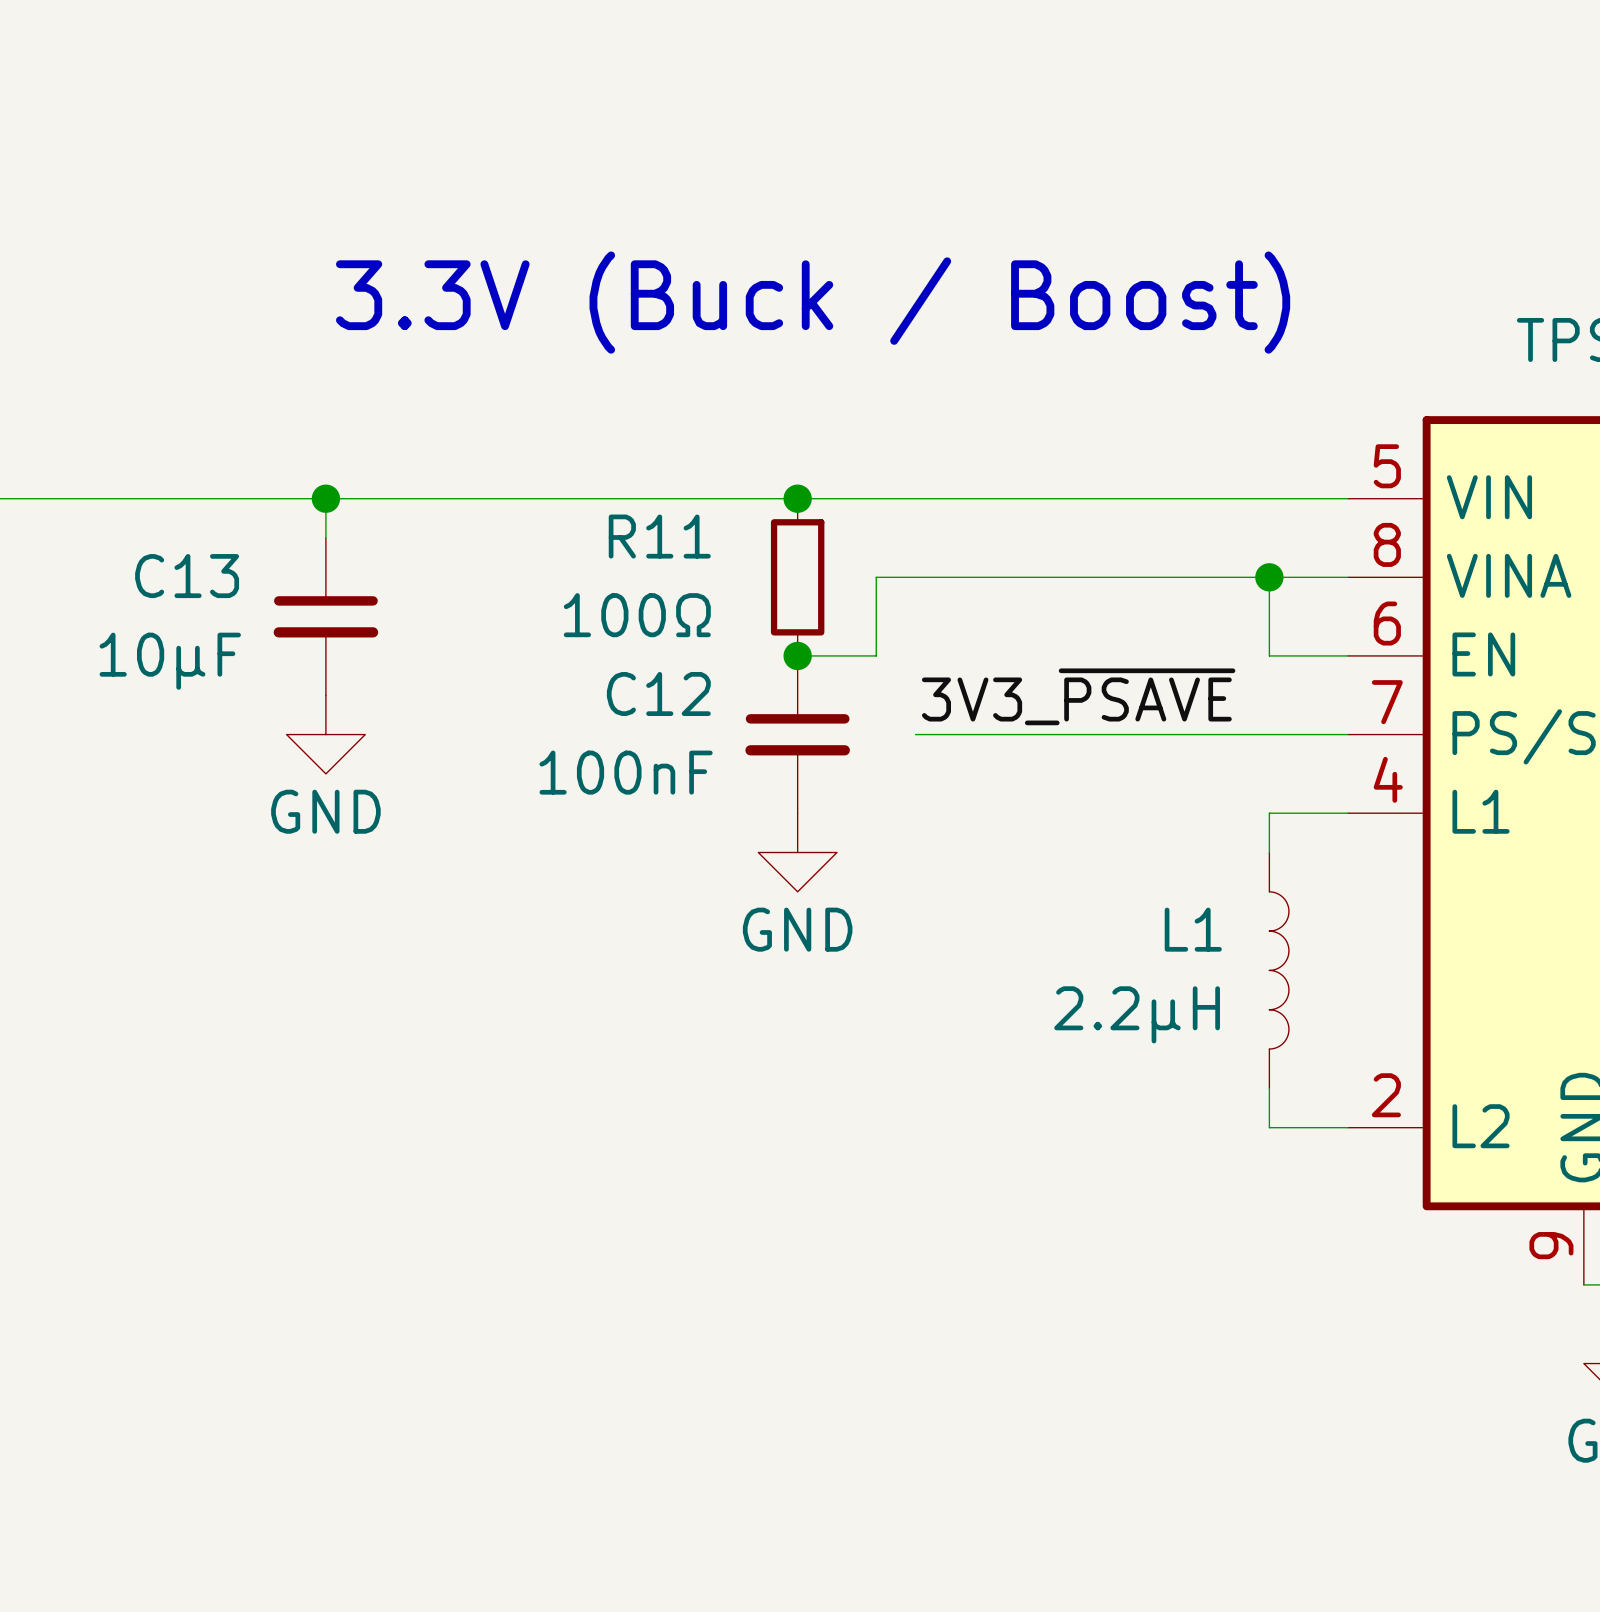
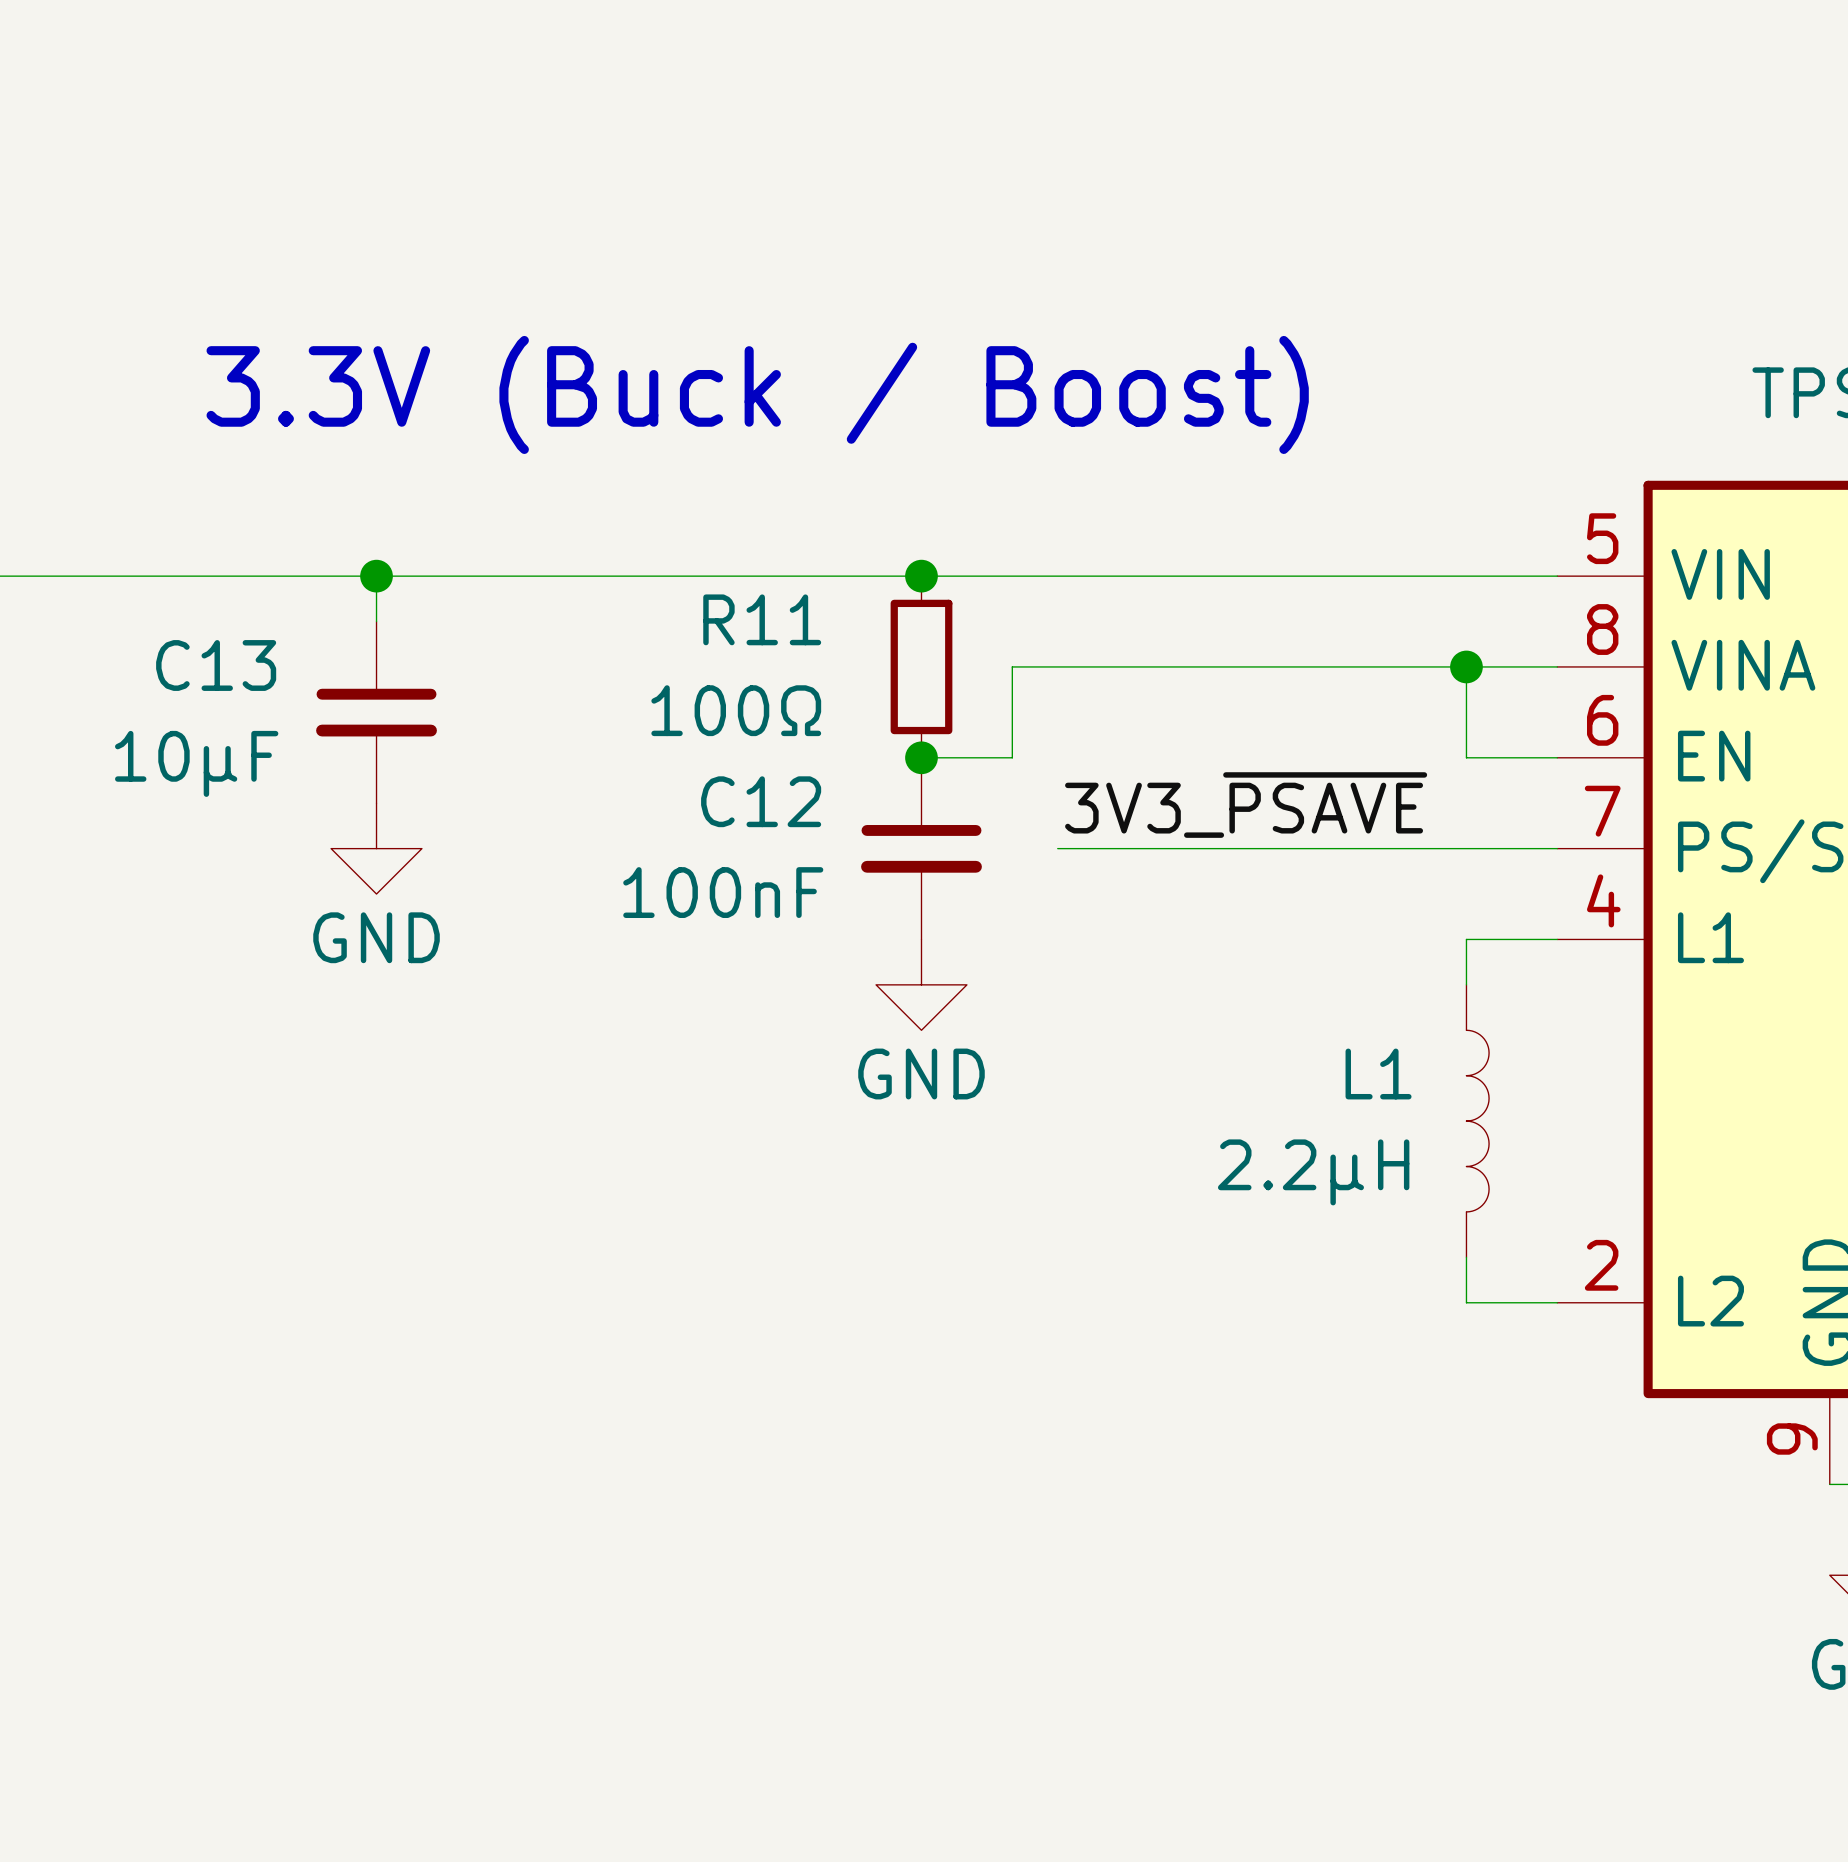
text position: 3.3V (Buck / Boost) (813, 302) -> 3.3V (Buck / Boost) (757, 394)

